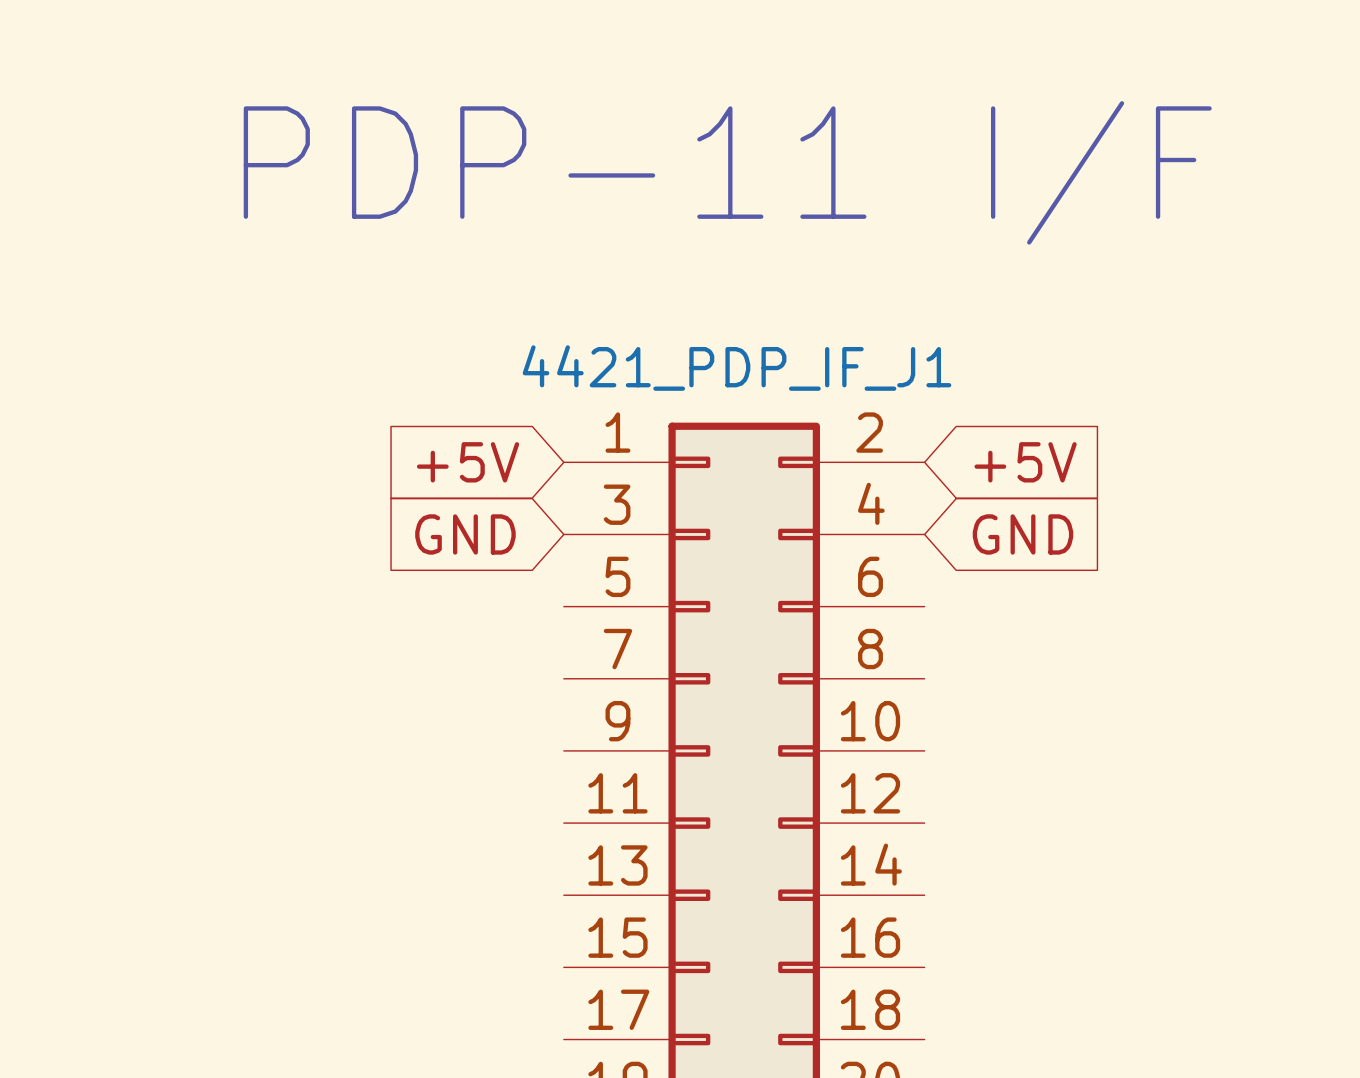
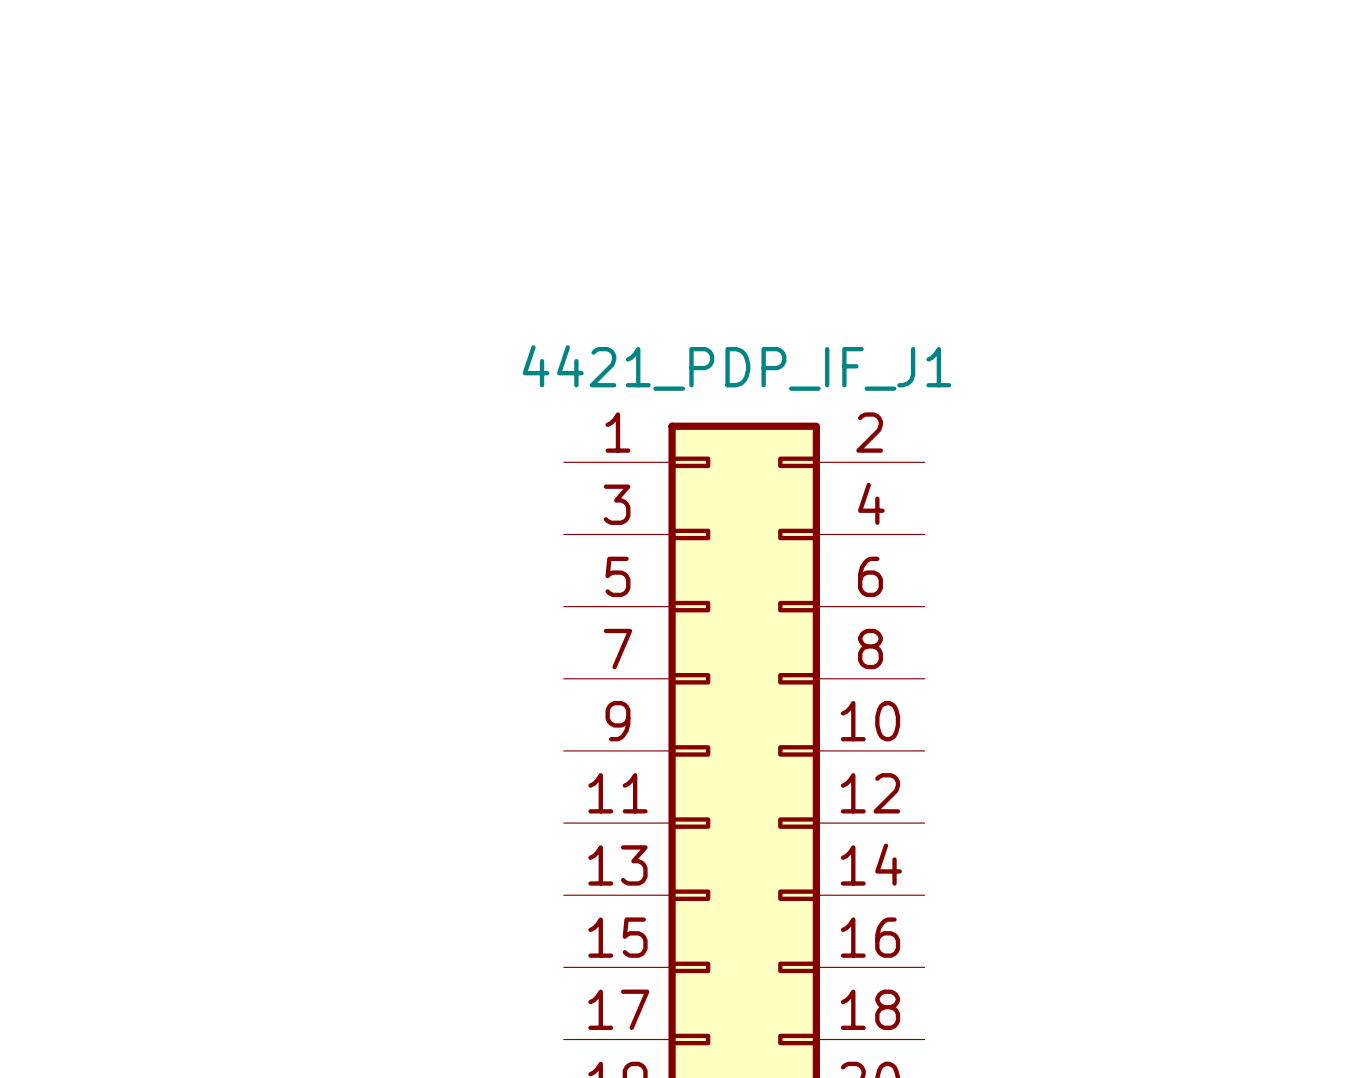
text: PDP-11 I/F (727, 172) -> none
global label: +5V (468, 462) -> none
global label: +5V (1025, 462) -> none
global label: GND (465, 534) -> none
global label: GND (1023, 534) -> none

